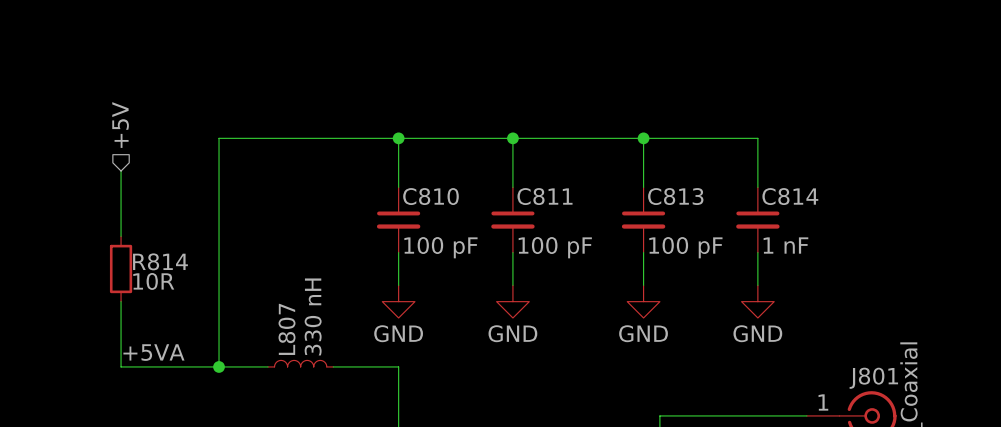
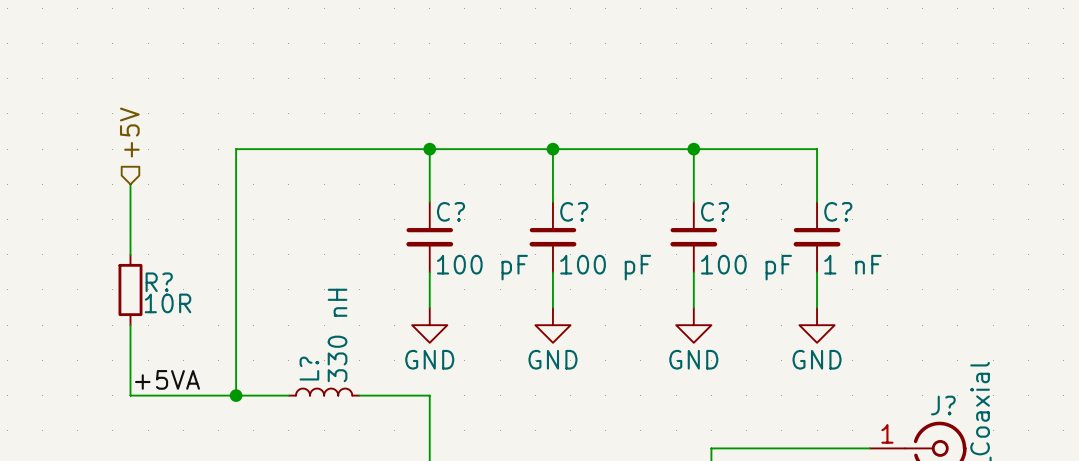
C810 name: C810 (430, 196) -> C? (451, 211)
C811 name: C811 (544, 196) -> C? (574, 211)
C813 name: C813 (675, 196) -> C? (715, 211)
C814 name: C814 (790, 196) -> C? (838, 211)
R814 name: R814 (160, 261) -> R? (159, 282)
L807 name: L807 (287, 329) -> L? (309, 368)
J801 name: J801 (873, 378) -> J? (943, 405)

